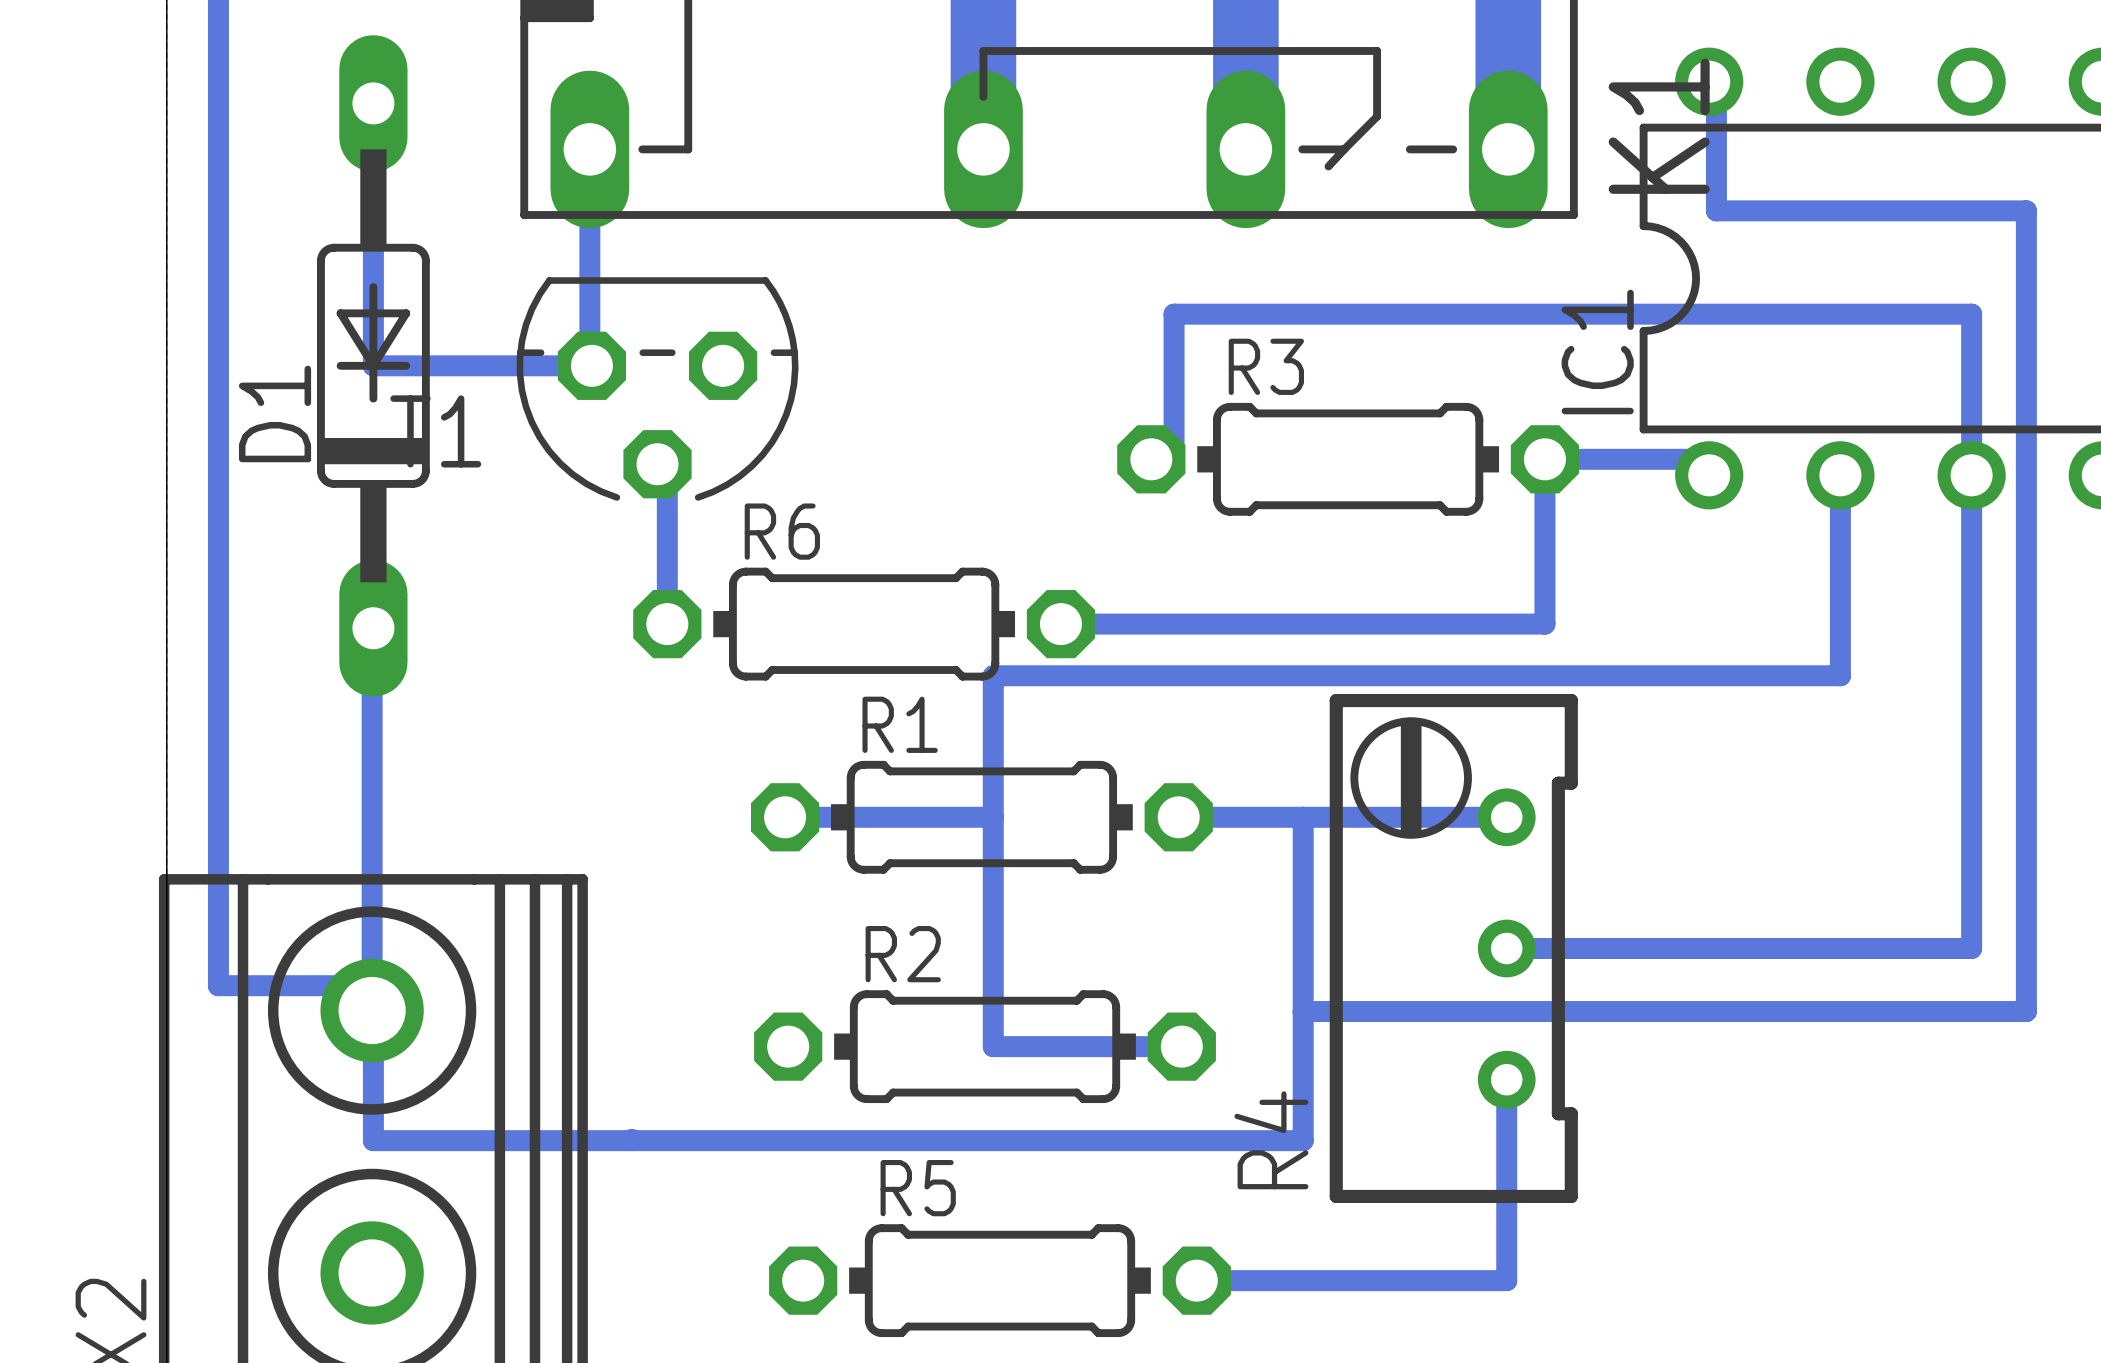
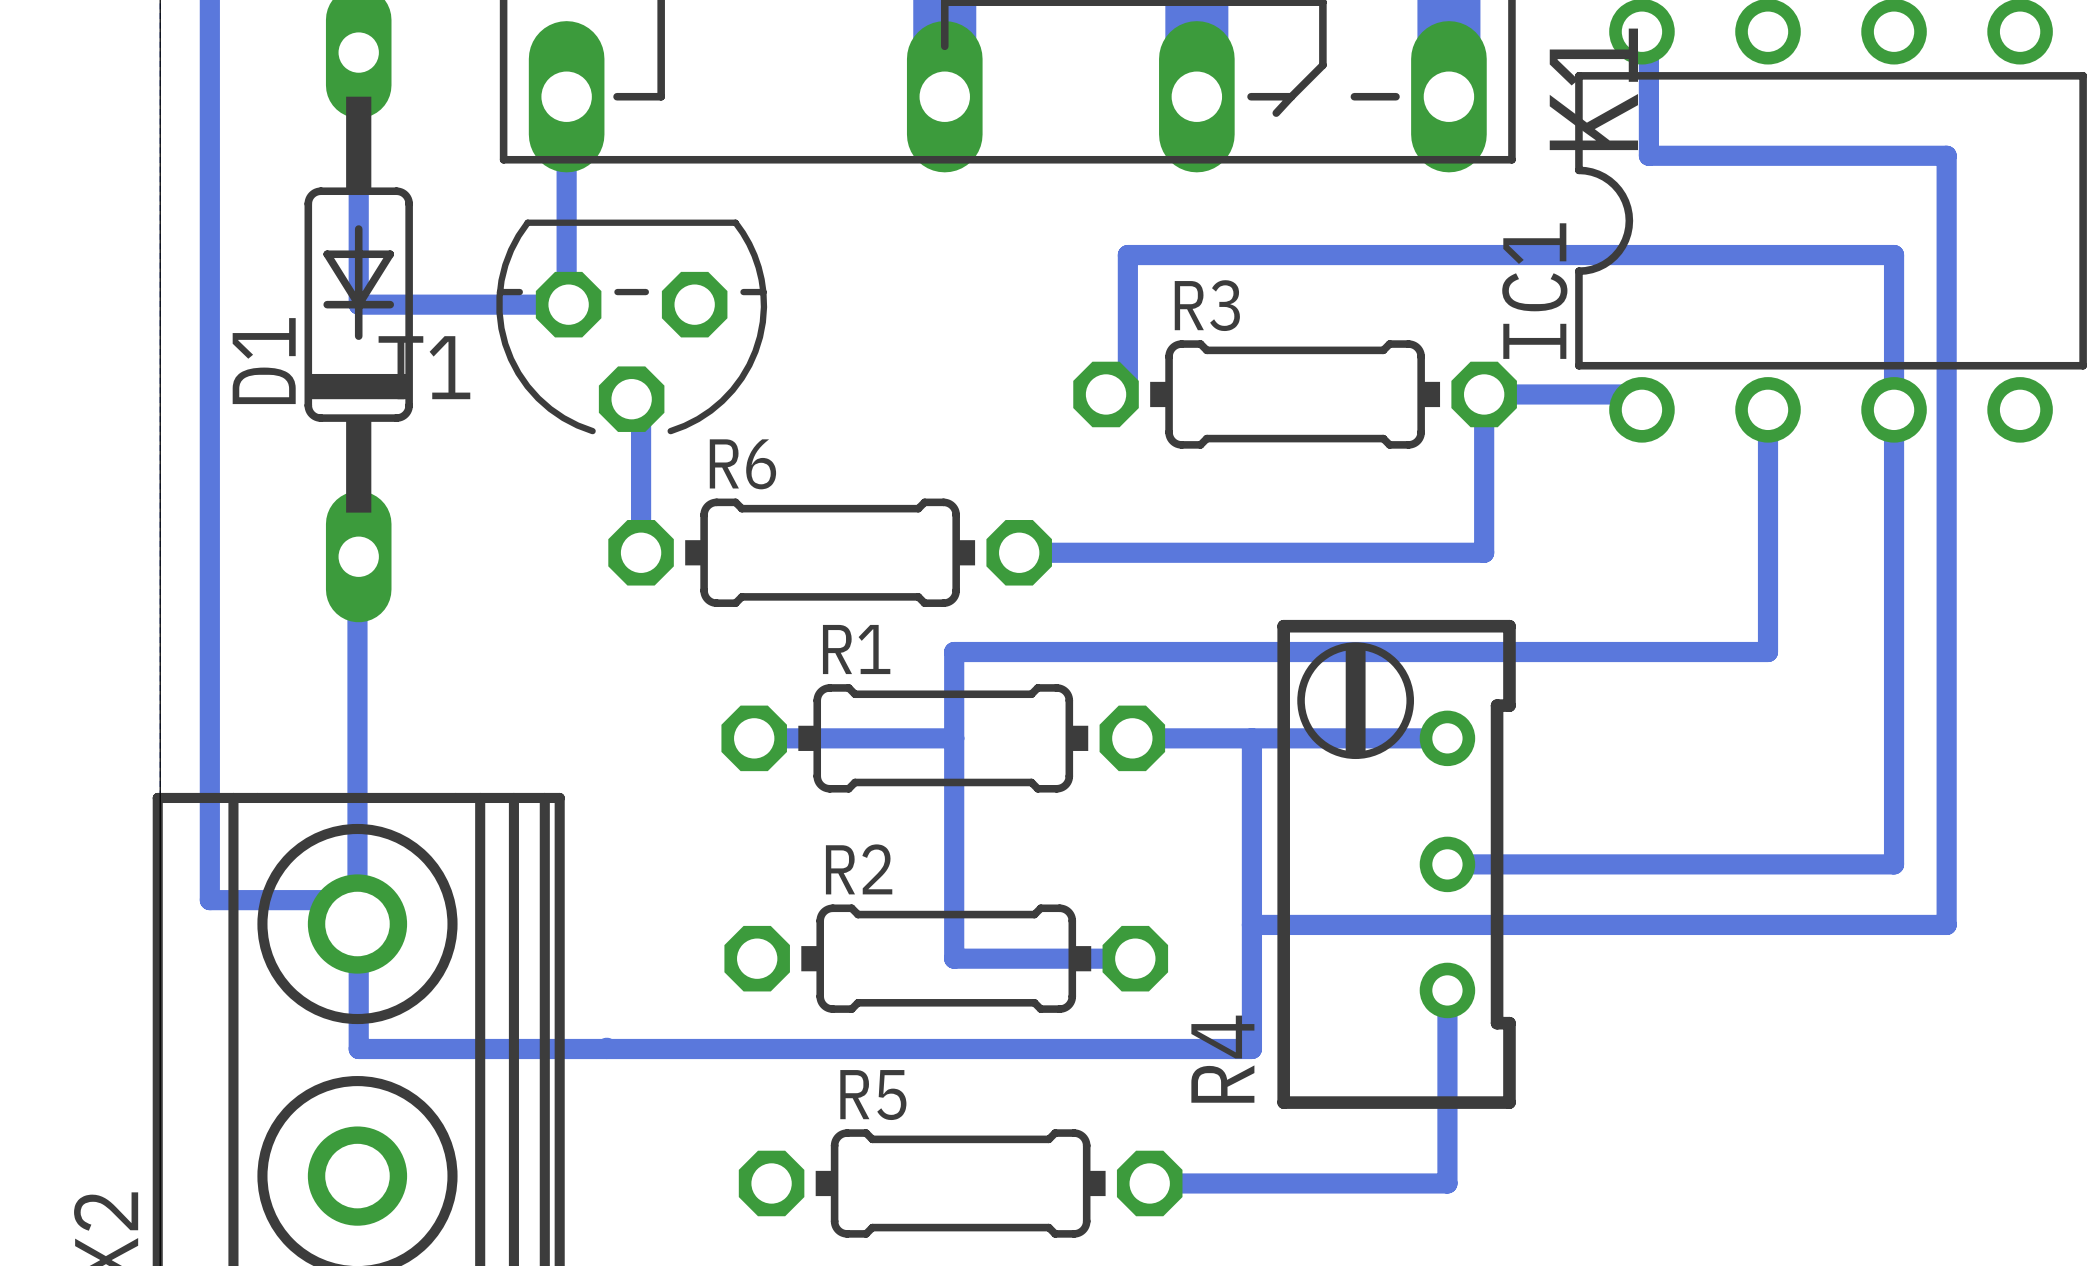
bottom track: (1840, 675) (993, 675) (993, 727) -> (1768, 602) (1768, 652) (954, 652)

